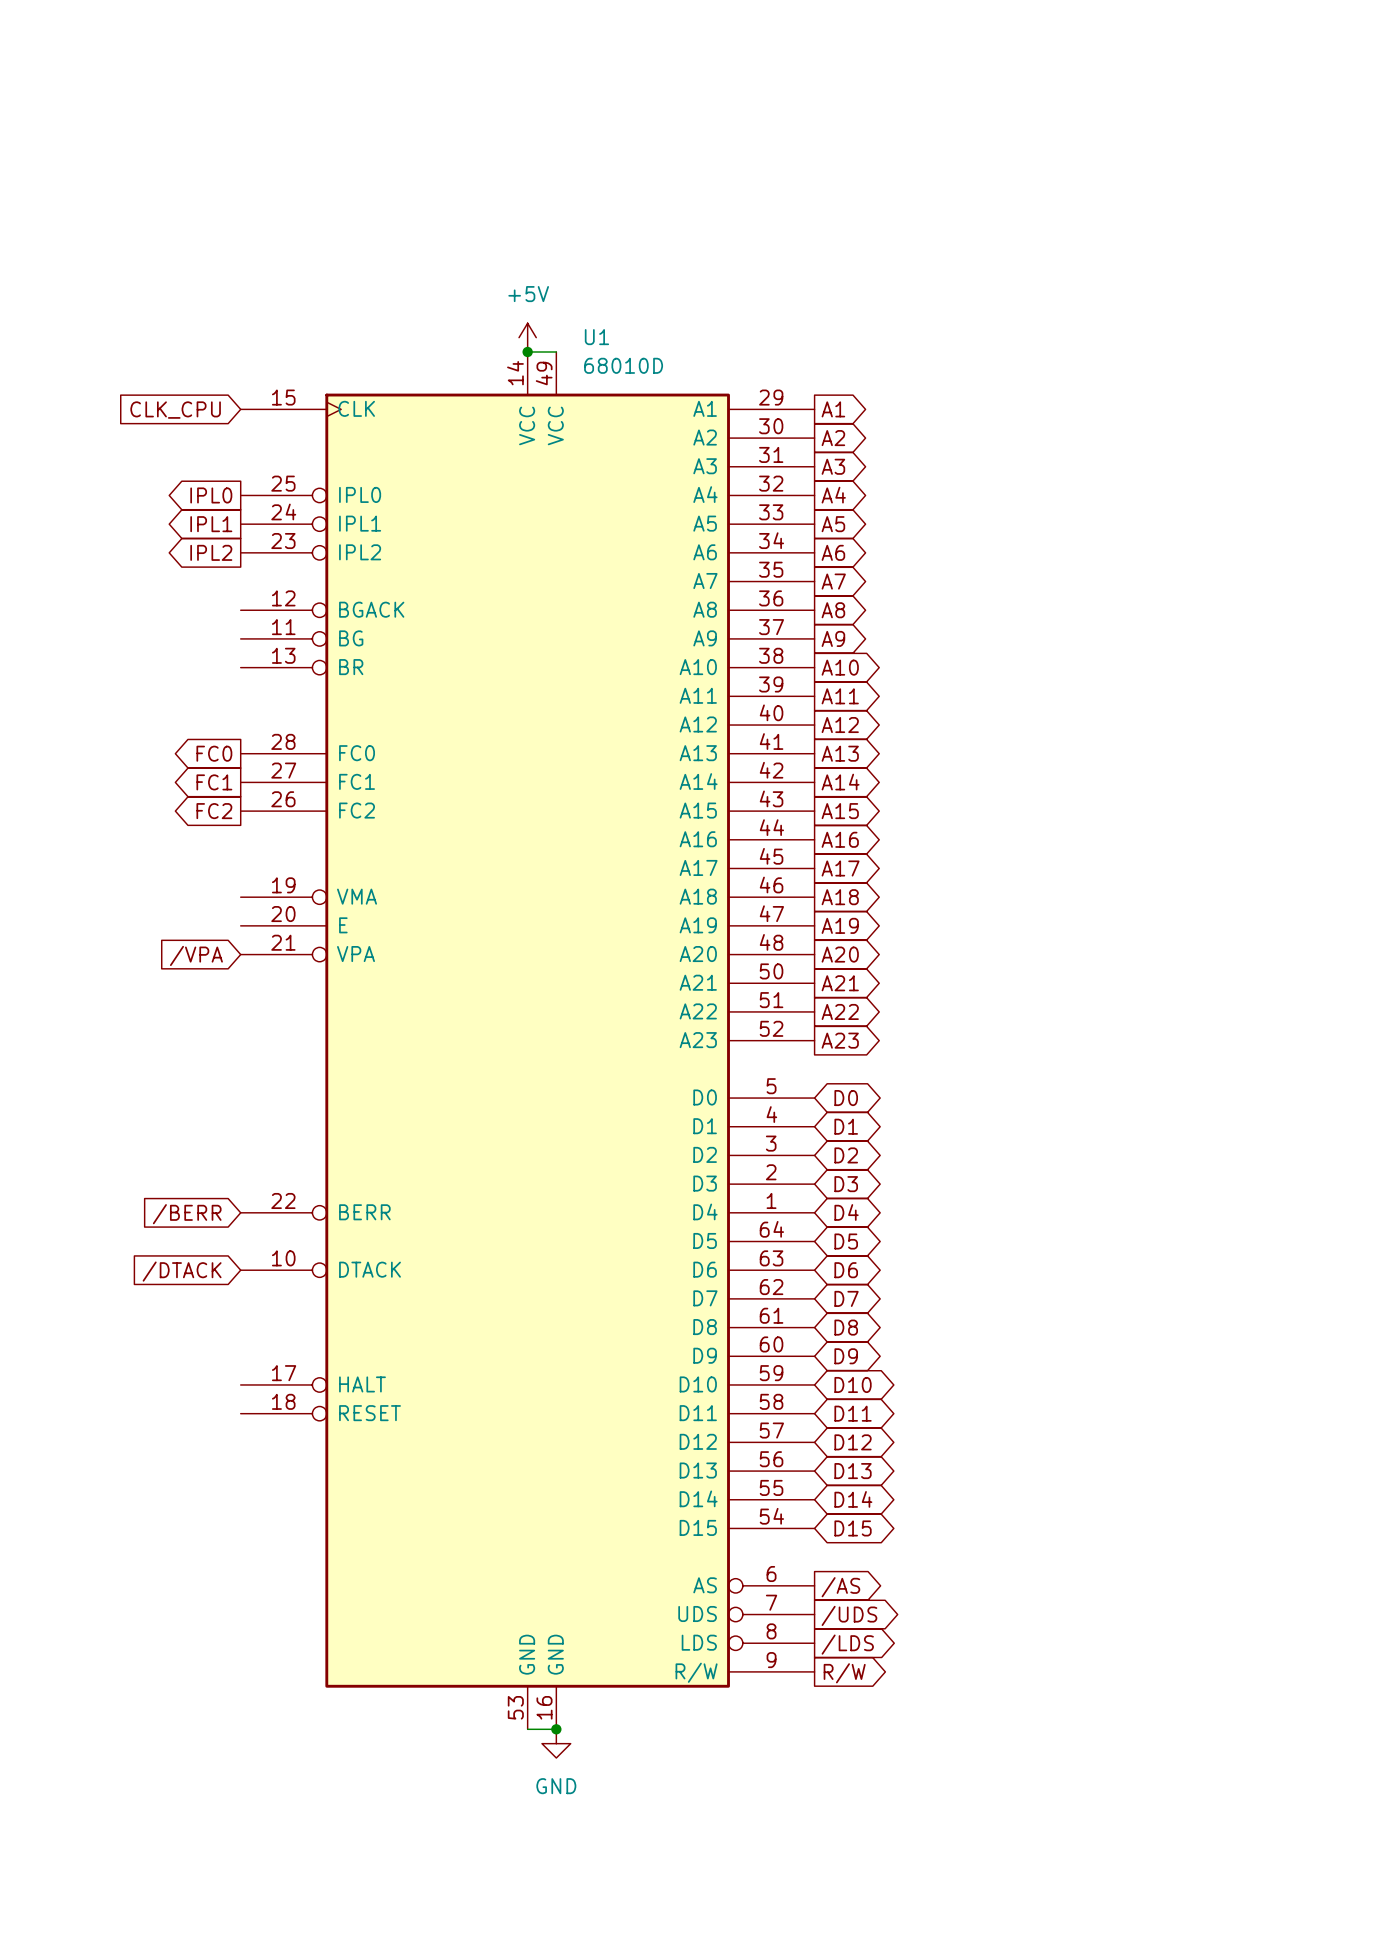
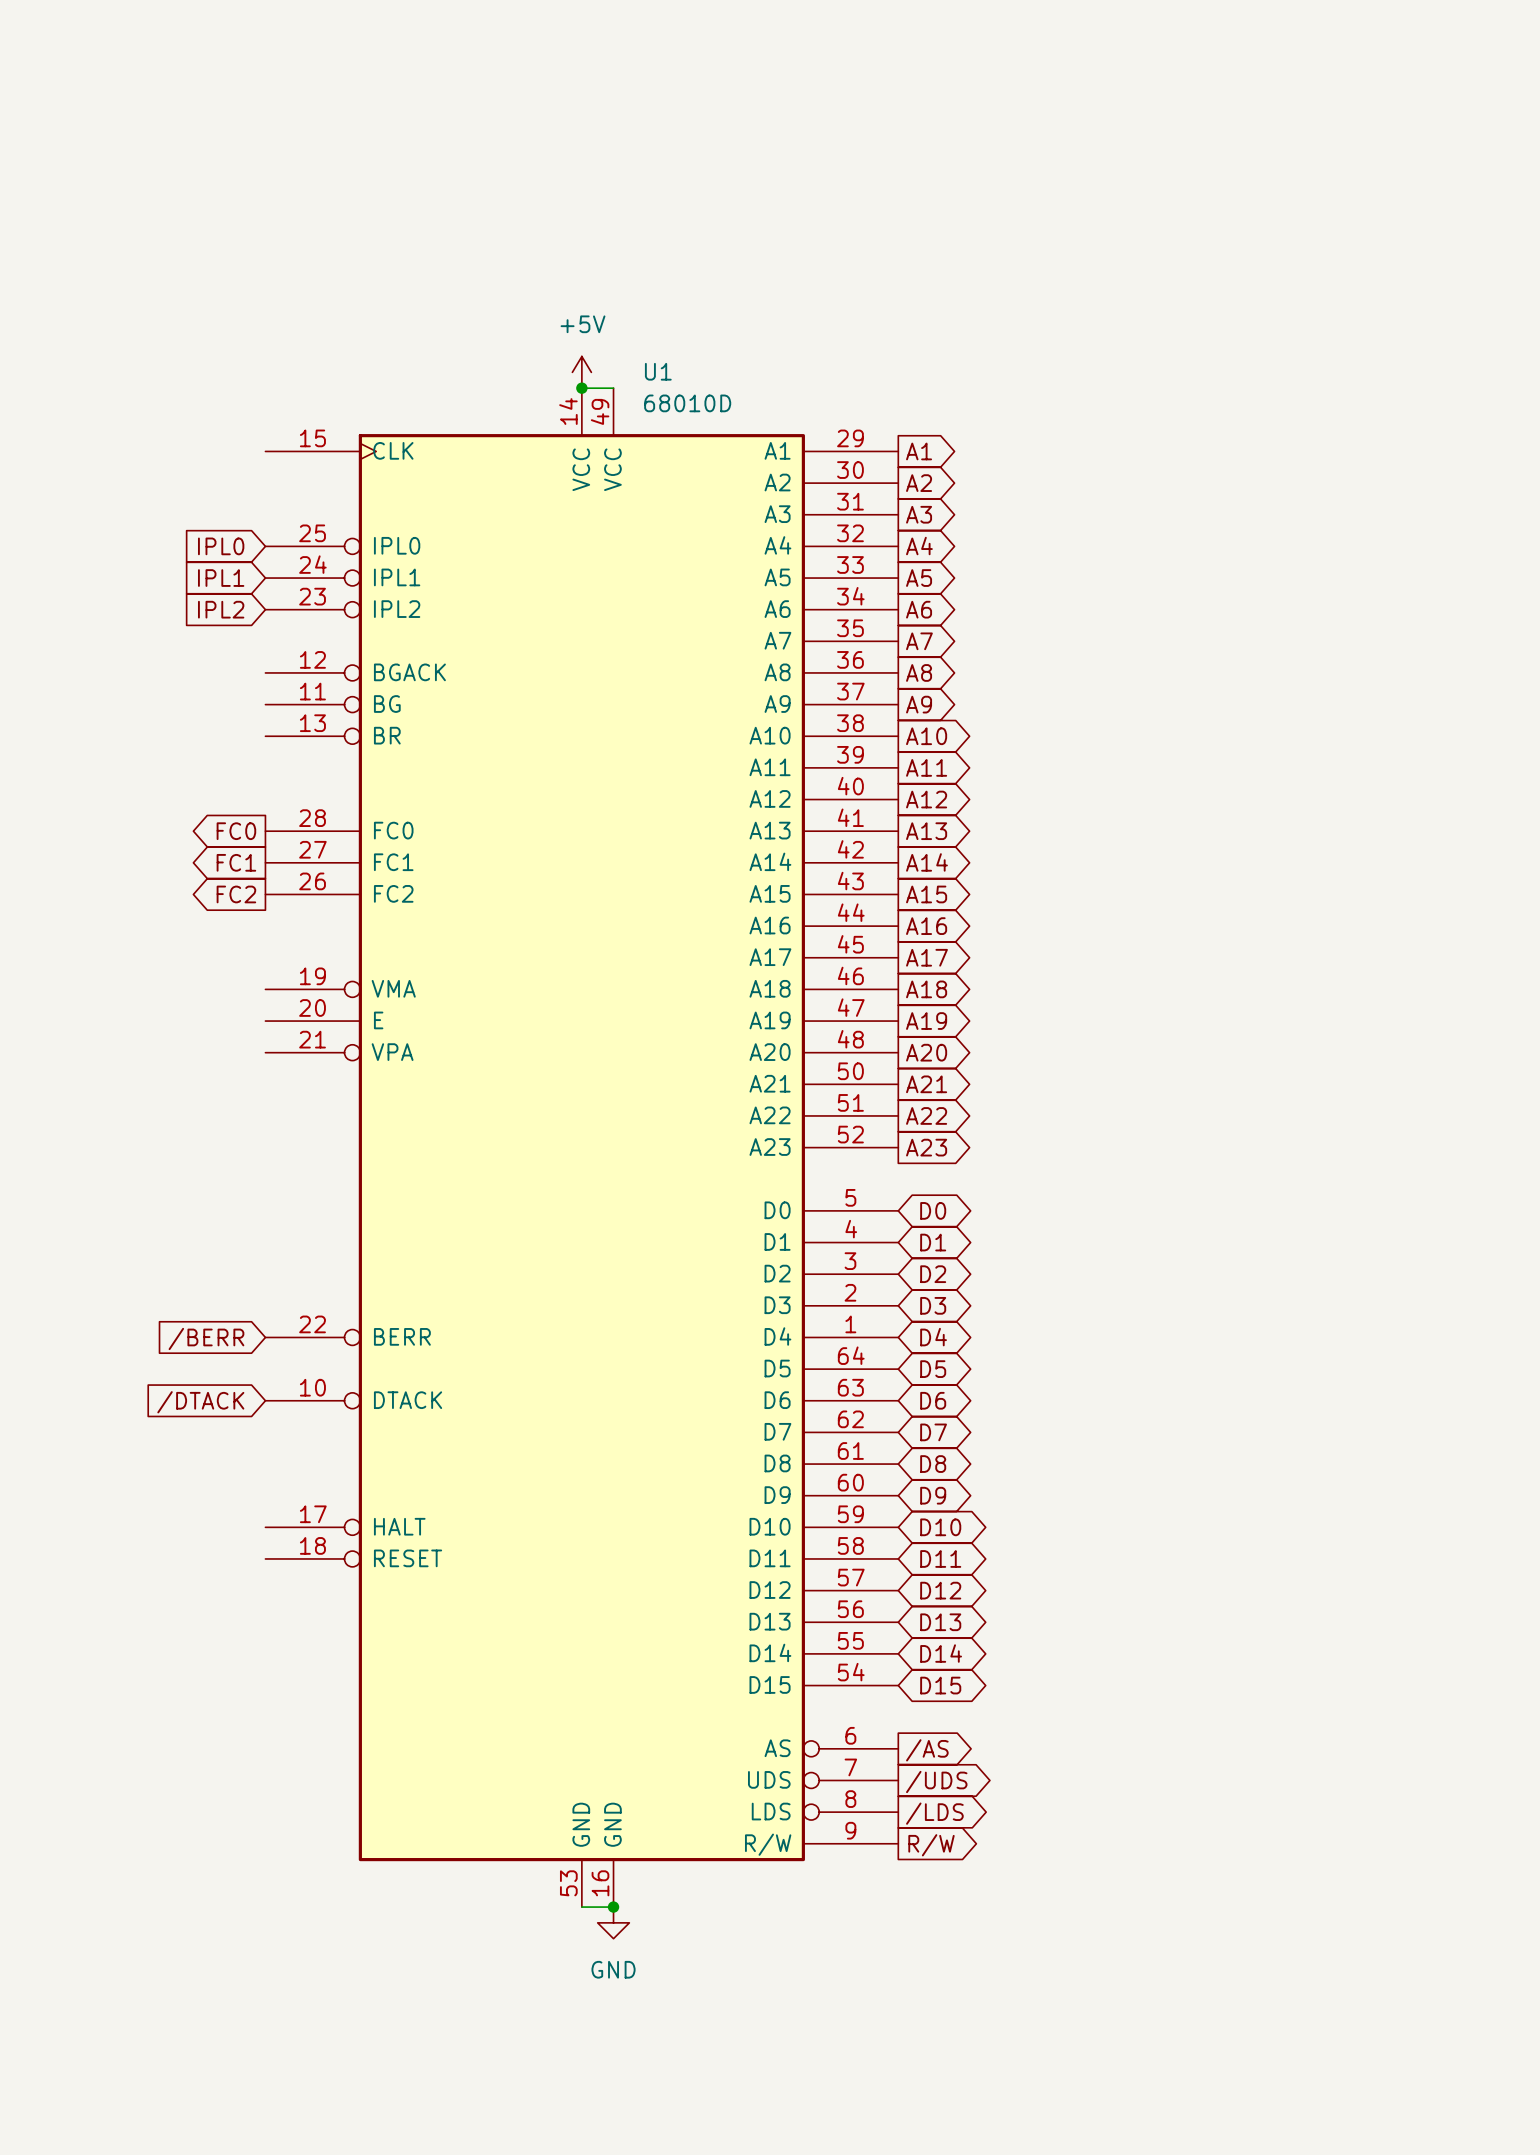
global label: CLK_CPU (175, 410) -> none
global label shape: output (211, 495) -> input (221, 546)
global label shape: output (211, 524) -> input (221, 578)
global label shape: output (211, 552) -> input (221, 609)
global label: /VPA (196, 955) -> none

